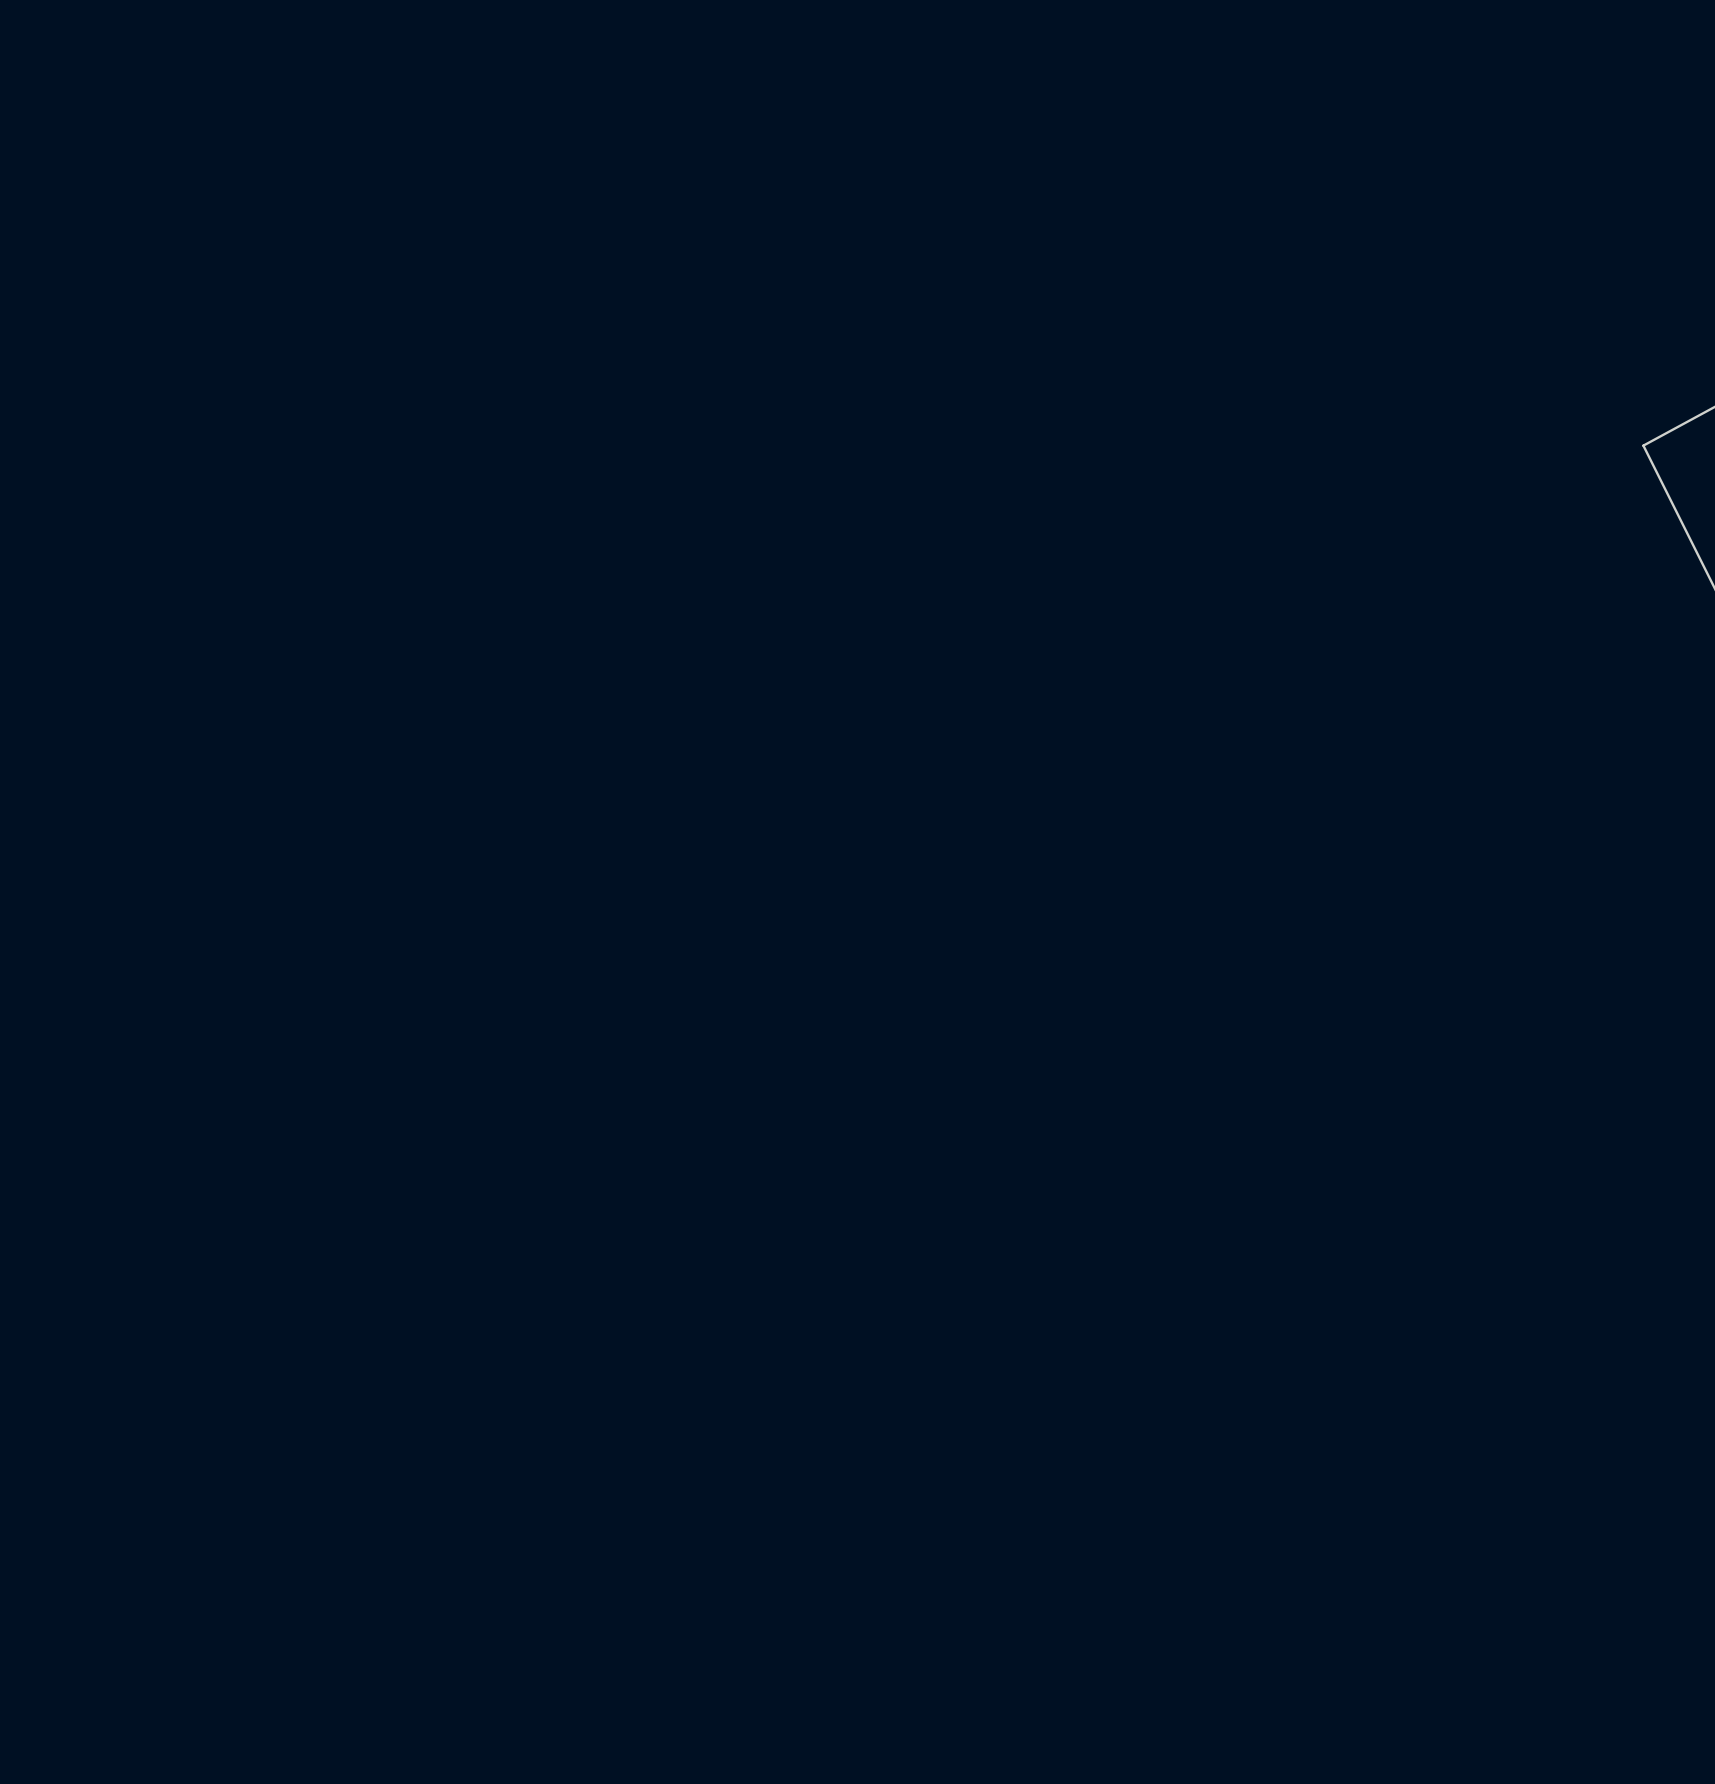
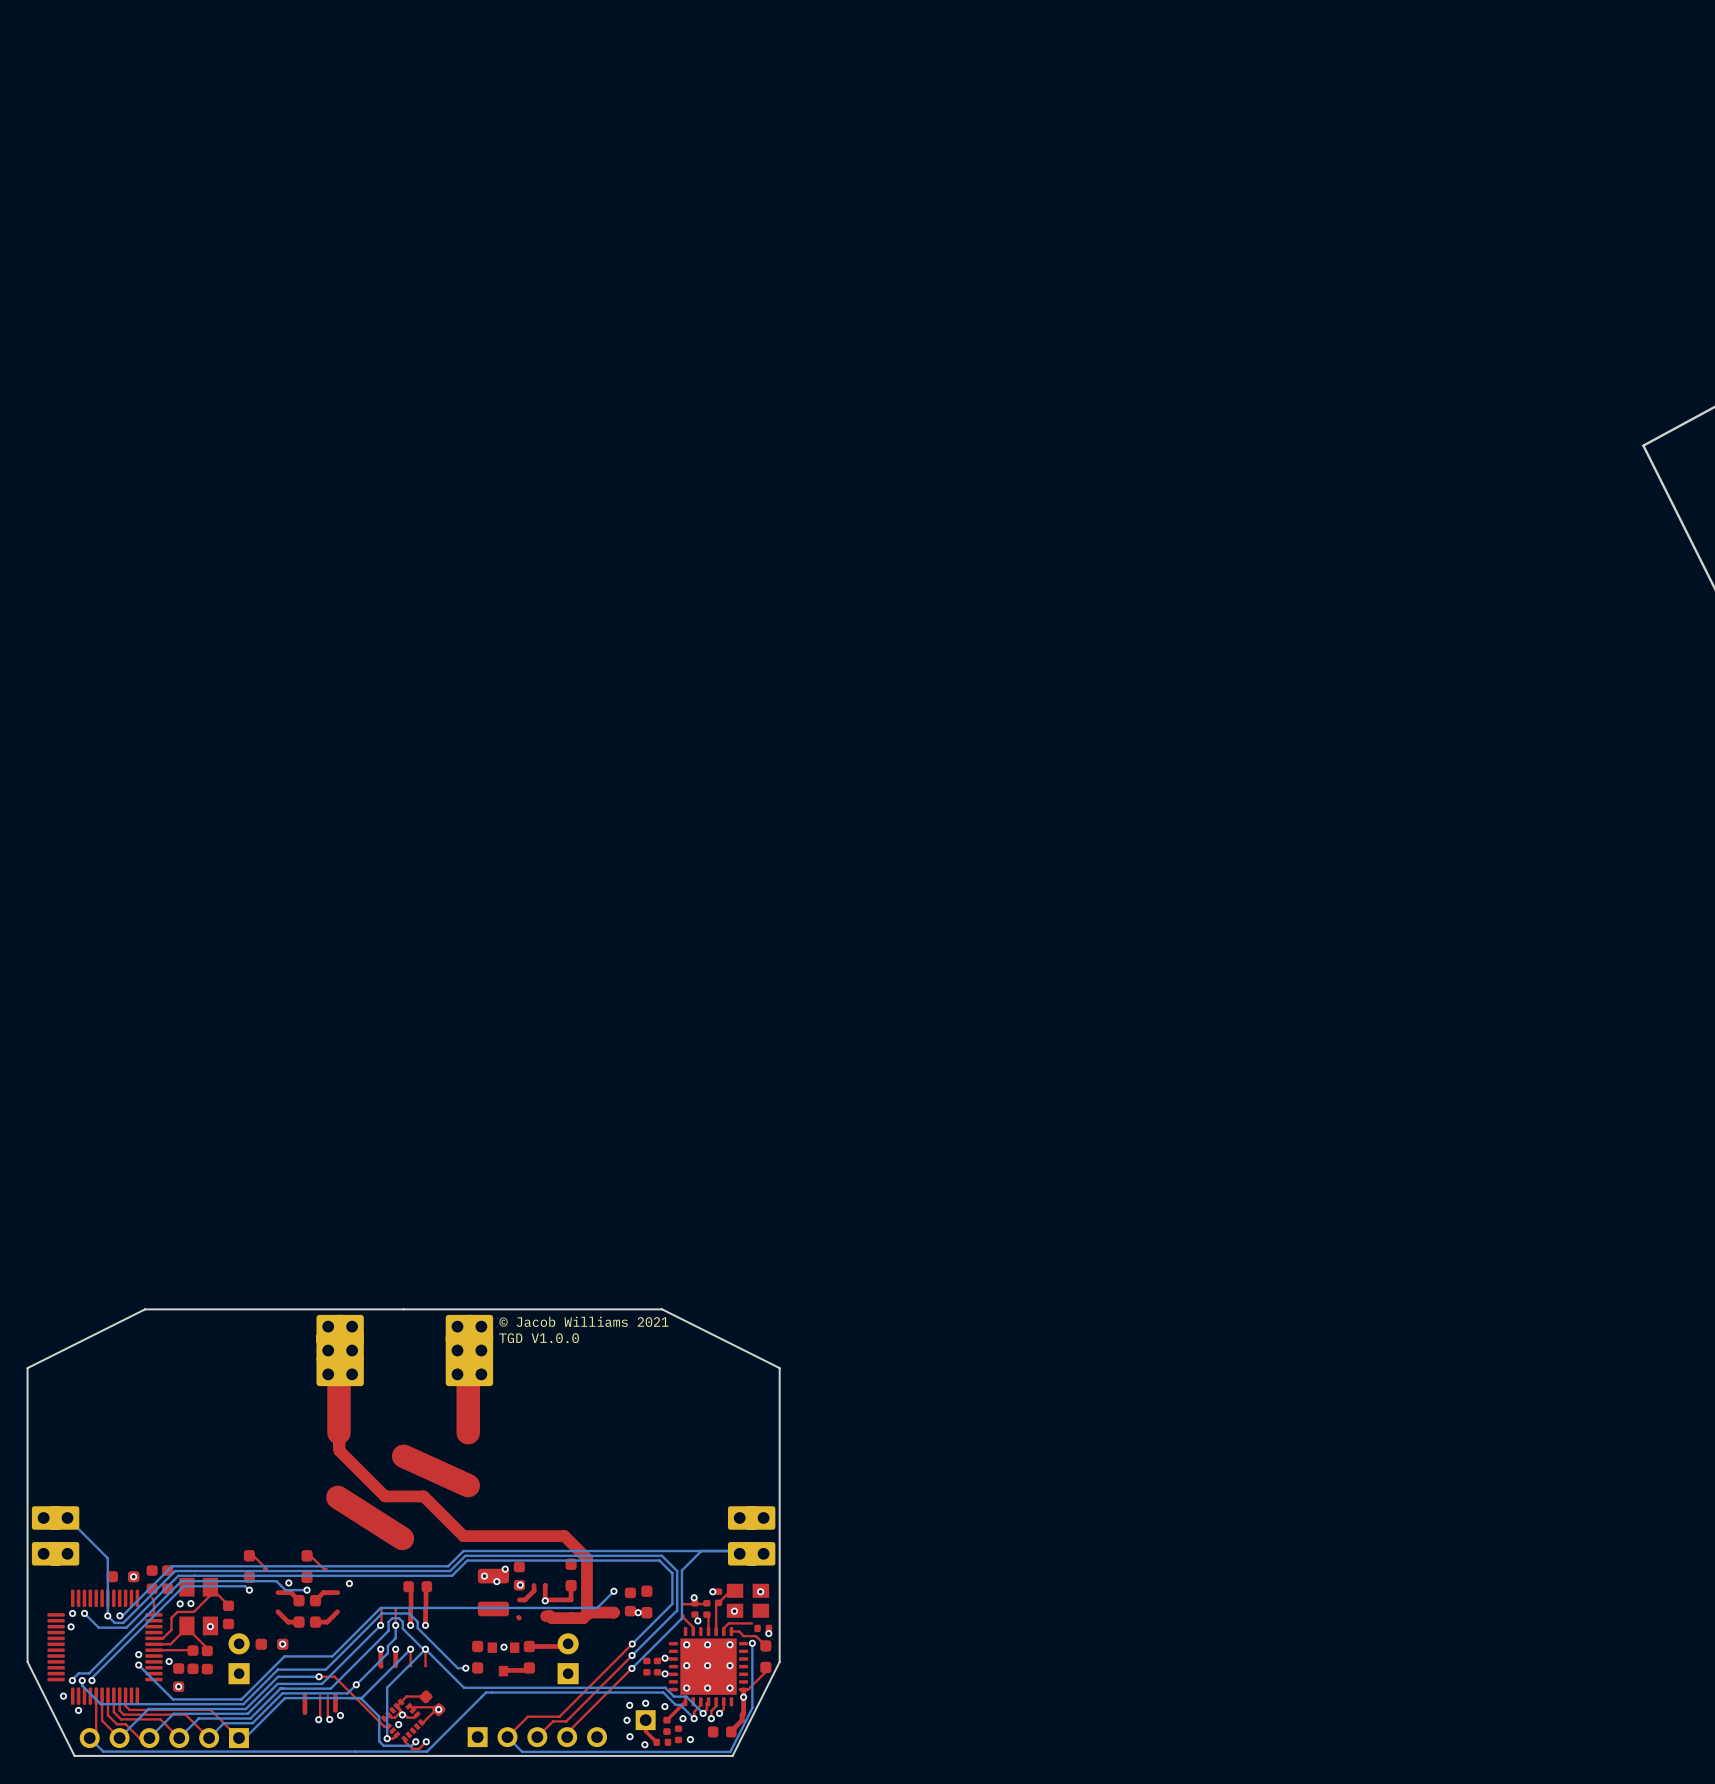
board edge: none -> (662, 1309) (145, 1309) (27, 1368) (27, 1661) (74, 1755) (732, 1755) (779, 1661) (779, 1368) (662, 1309)
text: none -> © Jacob Williams 2021 (584, 1321)
text: none -> TGD V1.0.0 (539, 1338)
top track: none -> (328, 1350) (338, 1361) (338, 1448)
part: none -> (340, 1350)
part: none -> (469, 1350)
top track: none -> (481, 1350) (468, 1363) (468, 1432)
top track: none -> (339, 1433) (339, 1450) (385, 1496) (423, 1496) (463, 1536) (564, 1536) (586, 1558) (586, 1614)
top track: none -> (403, 1456) (468, 1485)
top track: none -> (337, 1497) (402, 1538)
bottom track: none -> (67, 1520) (67, 1517) (107, 1558) (107, 1615) (114, 1622) (123, 1622) (175, 1571) (450, 1571) (465, 1555) (661, 1555) (677, 1571) (677, 1610) (632, 1655)
part: none -> (55, 1535)
part: none -> (751, 1535)
bottom track: none -> (701, 1551) (681, 1570) (681, 1618) (631, 1668)
bottom track: none -> (739, 1553) (736, 1551) (463, 1551) (448, 1566) (172, 1566) (122, 1615) (119, 1615)
top track: none -> (249, 1555) (253, 1555) (266, 1569) (263, 1569)
top track: none -> (307, 1555) (310, 1555) (323, 1569) (326, 1569)
part: none -> (249, 1566)
part: none -> (307, 1566)
via: none -> (505, 1569)
part: none -> (571, 1574)
part: none -> (122, 1576)
via: none -> (133, 1576)
via: none -> (484, 1576)
part: none -> (519, 1576)
part: none -> (152, 1579)
part: none -> (167, 1579)
via: none -> (496, 1581)
via: none -> (288, 1582)
via: none -> (349, 1583)
via: none -> (520, 1585)
top track: none -> (534, 1585) (534, 1590) (524, 1599) (519, 1599)
top track: none -> (545, 1585) (545, 1600) (571, 1599) (571, 1585)
top track: none -> (408, 1586) (411, 1589) (410, 1625)
part: none -> (417, 1586)
top track: none -> (426, 1586) (425, 1625)
bottom track: none -> (249, 1590) (245, 1586) (183, 1586) (91, 1678) (91, 1680)
via: none -> (249, 1590)
bottom track: none -> (307, 1590) (285, 1590) (276, 1581) (181, 1581) (89, 1673) (78, 1673) (72, 1680)
via: none -> (307, 1590)
top track: none -> (735, 1590) (730, 1590) (716, 1605) (716, 1631)
bottom track: none -> (613, 1591) (597, 1607) (380, 1607) (332, 1656) (284, 1656) (241, 1699) (173, 1699) (138, 1665)
via: none -> (613, 1591)
via: none -> (712, 1591)
via: none -> (760, 1591)
top track: none -> (277, 1592) (290, 1592) (299, 1600)
top track: none -> (337, 1592) (323, 1592) (315, 1600)
part: none -> (493, 1592)
via: none -> (694, 1597)
part: none -> (718, 1597)
top track: none -> (152, 1598) (153, 1600) (153, 1614)
via: none -> (545, 1600)
part: none -> (747, 1600)
part: none -> (630, 1601)
part: none -> (646, 1601)
via: none -> (180, 1603)
via: none -> (190, 1603)
top track: none -> (706, 1603) (683, 1603)
top track: none -> (228, 1605) (210, 1587) (210, 1595) (193, 1611) (177, 1611) (171, 1617) (171, 1629) (163, 1638) (153, 1638)
part: none -> (198, 1606)
top track: none -> (381, 1608) (381, 1625)
top track: none -> (396, 1608) (395, 1625)
part: none -> (694, 1608)
part: none -> (706, 1608)
top track: none -> (277, 1611) (288, 1622) (299, 1622)
part: none -> (299, 1611)
part: none -> (315, 1611)
top track: none -> (337, 1611) (327, 1622) (315, 1622)
via: none -> (734, 1611)
top track: none -> (613, 1612) (588, 1612) (583, 1618) (552, 1618) (546, 1616)
via: none -> (638, 1612)
via: none -> (72, 1613)
bottom track: none -> (84, 1613) (98, 1627) (126, 1627) (178, 1575) (452, 1575) (467, 1560) (659, 1560) (672, 1572) (672, 1603) (632, 1644)
via: none -> (84, 1613)
part: none -> (228, 1614)
via: none -> (107, 1615)
via: none -> (119, 1615)
top track: none -> (683, 1615) (693, 1627) (693, 1631)
top track: none -> (706, 1615) (708, 1616) (708, 1631)
top track: none -> (518, 1617) (519, 1618)
via: none -> (697, 1620)
top track: none -> (751, 1623) (728, 1623) (723, 1628) (723, 1631)
bottom track: none -> (380, 1625) (322, 1683) (277, 1683) (247, 1713) (173, 1713) (149, 1738)
via: none -> (380, 1625)
bottom track: none -> (395, 1625) (395, 1638) (387, 1646) (387, 1653) (347, 1693) (282, 1693) (252, 1723) (223, 1723) (209, 1738)
via: none -> (395, 1625)
via: none -> (410, 1625)
via: none -> (425, 1625)
via: none -> (71, 1626)
via: none -> (210, 1626)
part: none -> (763, 1628)
top track: none -> (731, 1631) (739, 1631) (743, 1636) (755, 1636) (765, 1645)
via: none -> (768, 1633)
top track: none -> (568, 1643) (565, 1646) (529, 1646)
bottom track: none -> (752, 1643) (752, 1707) (730, 1751) (522, 1751) (507, 1737)
via: none -> (752, 1643)
top track: none -> (153, 1644) (170, 1644) (185, 1626) (206, 1647) (210, 1647)
part: none -> (272, 1644)
via: none -> (282, 1644)
top track: none -> (632, 1644) (559, 1716) (527, 1716) (507, 1737)
via: none -> (632, 1644)
via: none -> (686, 1644)
via: none -> (707, 1644)
via: none -> (729, 1644)
part: none -> (105, 1647)
via: none -> (504, 1647)
top track: none -> (380, 1649) (381, 1666)
via: none -> (380, 1649)
top track: none -> (395, 1649) (396, 1666)
via: none -> (395, 1649)
top track: none -> (410, 1649) (411, 1666)
bottom track: none -> (410, 1649) (361, 1698) (285, 1698) (245, 1738) (238, 1738)
via: none -> (410, 1649)
top track: none -> (425, 1649) (426, 1666)
bottom track: none -> (425, 1649) (464, 1687) (665, 1687) (674, 1696) (686, 1696) (703, 1713)
bottom track: none -> (425, 1649) (387, 1687) (387, 1738)
bottom track: none -> (425, 1649) (402, 1628) (402, 1621) (399, 1618) (392, 1618) (388, 1621) (388, 1630) (330, 1688) (280, 1688)
via: none -> (425, 1649)
top track: none -> (195, 1650) (153, 1650)
via: none -> (138, 1654)
top track: none -> (632, 1655) (566, 1721) (553, 1721) (537, 1737)
via: none -> (632, 1655)
part: none -> (765, 1656)
part: none -> (477, 1657)
part: none -> (529, 1657)
part: none -> (239, 1658)
part: none -> (568, 1658)
via: none -> (665, 1658)
part: none -> (193, 1659)
part: none -> (207, 1659)
part: none -> (503, 1659)
via: none -> (169, 1661)
via: none -> (138, 1665)
via: none -> (686, 1665)
via: none -> (707, 1665)
via: none -> (729, 1665)
top track: none -> (765, 1665) (765, 1672) (748, 1689) (743, 1689) (742, 1715)
part: none -> (646, 1666)
part: none -> (657, 1666)
part: none -> (708, 1666)
top track: none -> (529, 1667) (526, 1670) (503, 1671)
bottom track: none -> (465, 1668) (457, 1668) (417, 1628) (417, 1621) (409, 1613) (381, 1613) (325, 1669) (277, 1669) (243, 1704) (100, 1704) (82, 1685) (82, 1680)
via: none -> (465, 1668)
top track: none -> (631, 1668) (567, 1732) (567, 1737)
via: none -> (631, 1668)
via: none -> (665, 1673)
top track: none -> (319, 1676) (334, 1676) (384, 1726) (388, 1726)
bottom track: none -> (319, 1676) (278, 1676) (245, 1709) (148, 1709) (119, 1738)
via: none -> (319, 1676)
part: none -> (178, 1677)
via: none -> (72, 1680)
via: none -> (82, 1680)
via: none -> (91, 1680)
via: none -> (356, 1684)
via: none -> (178, 1686)
bottom track: none -> (280, 1688) (250, 1718) (198, 1718) (179, 1738)
via: none -> (686, 1688)
via: none -> (707, 1688)
via: none -> (729, 1688)
top track: none -> (304, 1695) (304, 1712)
top track: none -> (320, 1695) (318, 1719)
top track: none -> (327, 1695) (327, 1717) (329, 1719)
top track: none -> (335, 1695) (335, 1710)
via: none -> (63, 1696)
top track: none -> (96, 1696) (96, 1731) (89, 1738)
top track: none -> (102, 1696) (102, 1720) (119, 1738)
top track: none -> (107, 1696) (107, 1715) (117, 1724) (125, 1724) (139, 1738) (149, 1738)
top track: none -> (113, 1696) (113, 1712) (121, 1719) (160, 1719) (179, 1738)
top track: none -> (119, 1696) (119, 1710) (123, 1714) (185, 1714) (209, 1738)
top track: none -> (125, 1696) (125, 1706) (129, 1709) (210, 1709) (239, 1738)
top track: none -> (423, 1696) (406, 1696) (396, 1706)
via: none -> (743, 1697)
bottom track: none -> (360, 1698) (379, 1716) (379, 1741) (383, 1745) (411, 1745) (415, 1741)
top track: none -> (685, 1701) (667, 1720)
top track: none -> (700, 1701) (700, 1705) (694, 1711) (694, 1718)
top track: none -> (708, 1701) (706, 1709) (703, 1713)
top track: none -> (716, 1701) (716, 1706) (711, 1711) (711, 1718)
top track: none -> (723, 1701) (723, 1709) (719, 1713)
part: none -> (432, 1703)
via: none -> (645, 1703)
via: none -> (629, 1705)
top track: none -> (396, 1706) (407, 1717) (414, 1717) (417, 1714)
top track: none -> (396, 1706) (399, 1712) (394, 1717) (388, 1714)
via: none -> (664, 1706)
top track: none -> (409, 1707) (434, 1707) (436, 1709) (421, 1722)
via: none -> (438, 1709)
via: none -> (78, 1710)
via: none -> (703, 1713)
via: none -> (719, 1713)
top track: none -> (743, 1713) (742, 1720) (732, 1730)
via: none -> (402, 1714)
via: none -> (340, 1715)
via: none -> (682, 1718)
bottom track: none -> (694, 1718) (680, 1704) (675, 1704) (663, 1692) (486, 1692) (427, 1751) (103, 1751) (89, 1738)
via: none -> (694, 1718)
via: none -> (711, 1718)
via: none -> (318, 1719)
via: none -> (329, 1719)
part: none -> (402, 1720)
via: none -> (627, 1720)
top track: none -> (645, 1720) (645, 1731) (656, 1742)
part: none -> (645, 1720)
via: none -> (398, 1724)
part: none -> (667, 1725)
part: none -> (722, 1731)
part: none -> (678, 1734)
top track: none -> (396, 1735) (393, 1738) (387, 1738)
via: none -> (630, 1736)
part: none -> (537, 1737)
part: none -> (164, 1738)
via: none -> (387, 1738)
top track: none -> (404, 1739) (412, 1748) (419, 1748) (426, 1741)
via: none -> (690, 1739)
via: none -> (415, 1741)
via: none -> (426, 1741)
part: none -> (662, 1742)
via: none -> (644, 1744)

